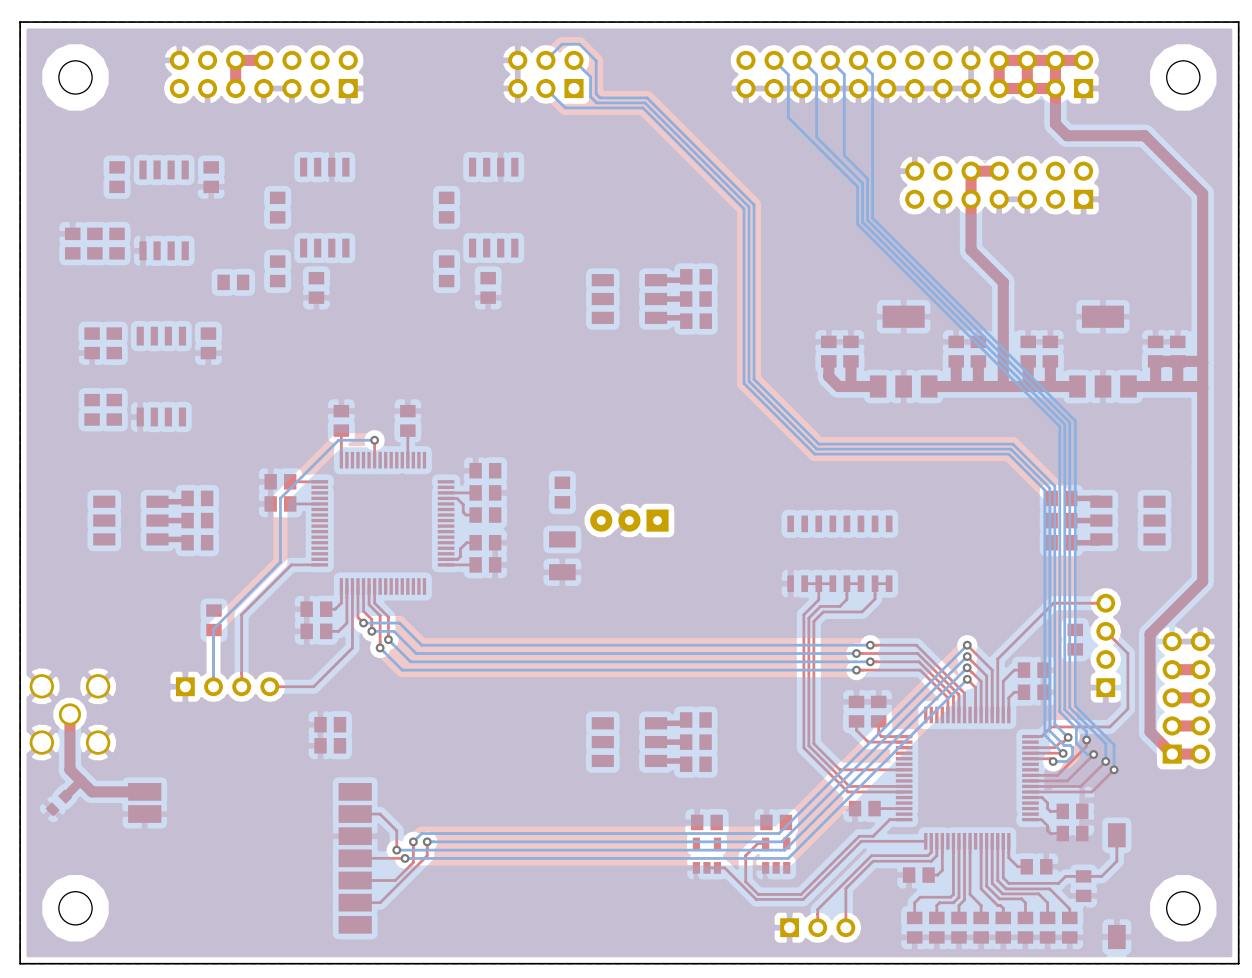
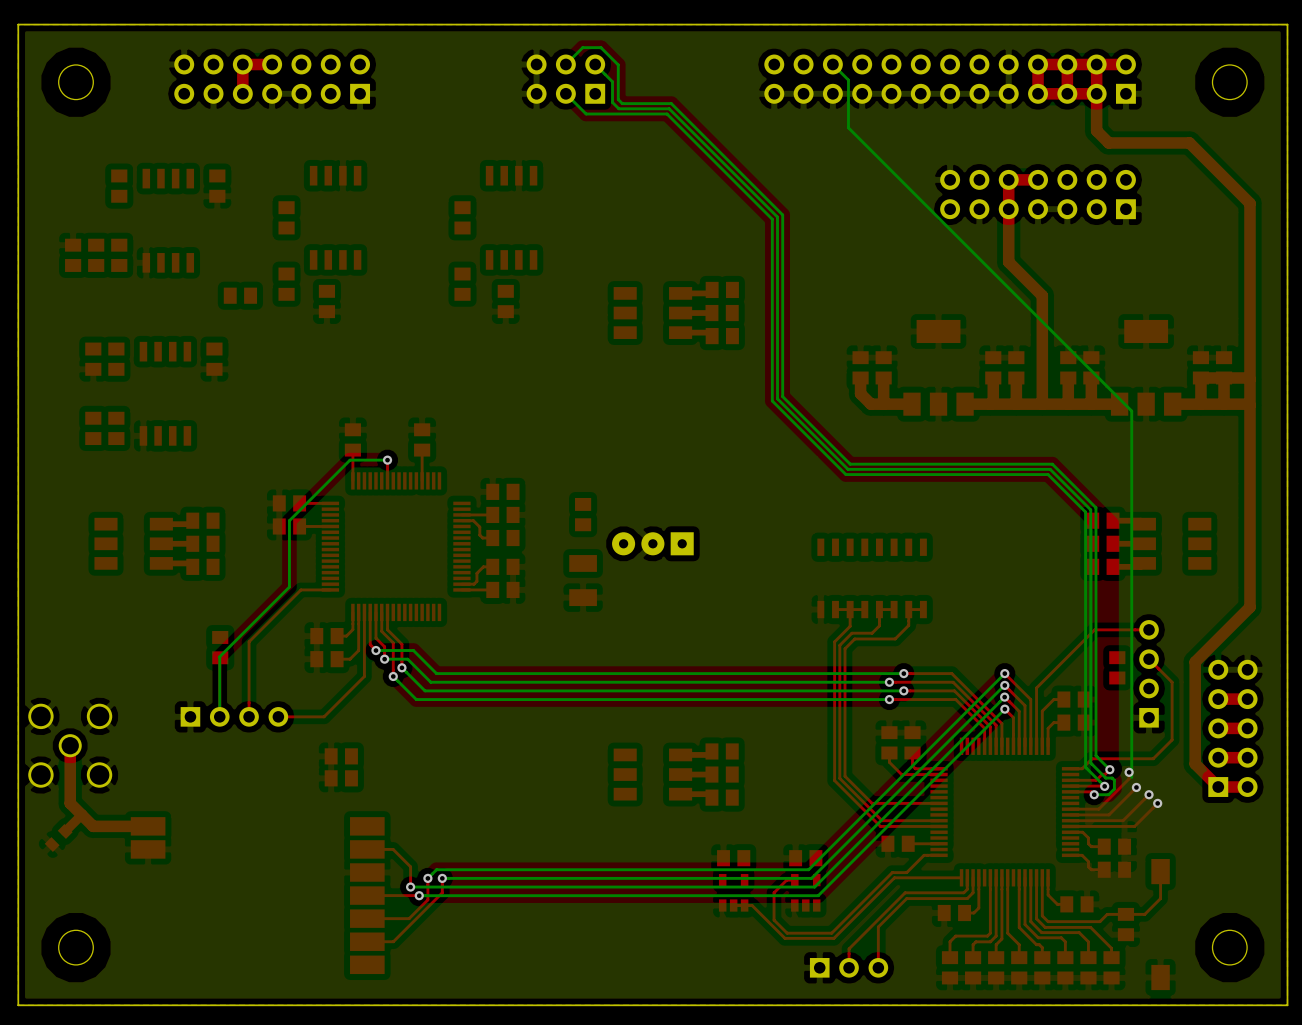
bottom track: (774, 60) (788, 74) (788, 117) (857, 186) (857, 224) (1059, 426) (1059, 711) (1076, 728) (1076, 743) (1087, 754) (1093, 754) -> none
bottom track: (830, 60) (844, 74) (844, 155) (867, 178) (867, 220) (1069, 422) (1069, 707) (1105, 743) (1105, 761) -> none
bottom track: (858, 60) (872, 74) (872, 218) (1075, 420) (1075, 706) (1114, 744) (1114, 769) -> none
bottom track: (816, 74) (816, 137) (862, 183) (862, 222) (1064, 424) (1064, 709) (1086, 731) (1086, 740) -> (847, 79) (848, 127) (1131, 411) (1131, 777)

